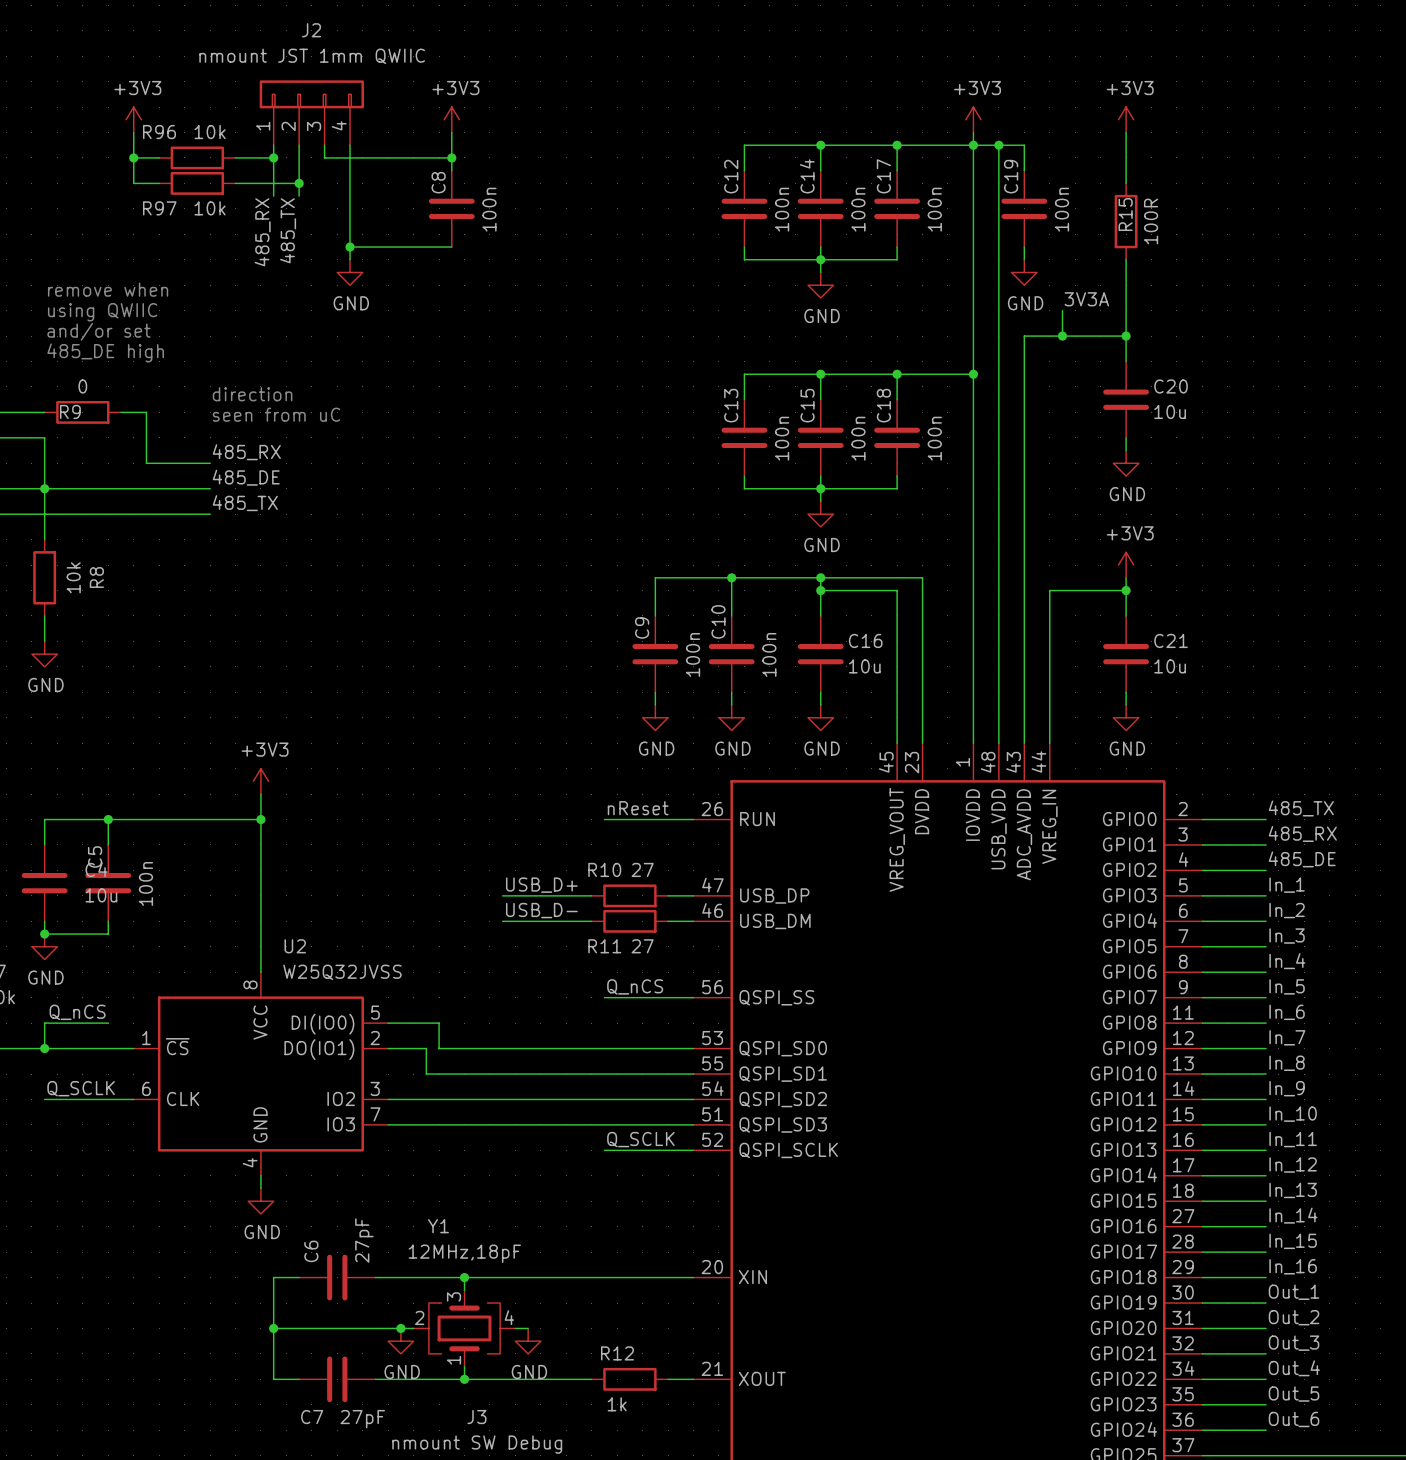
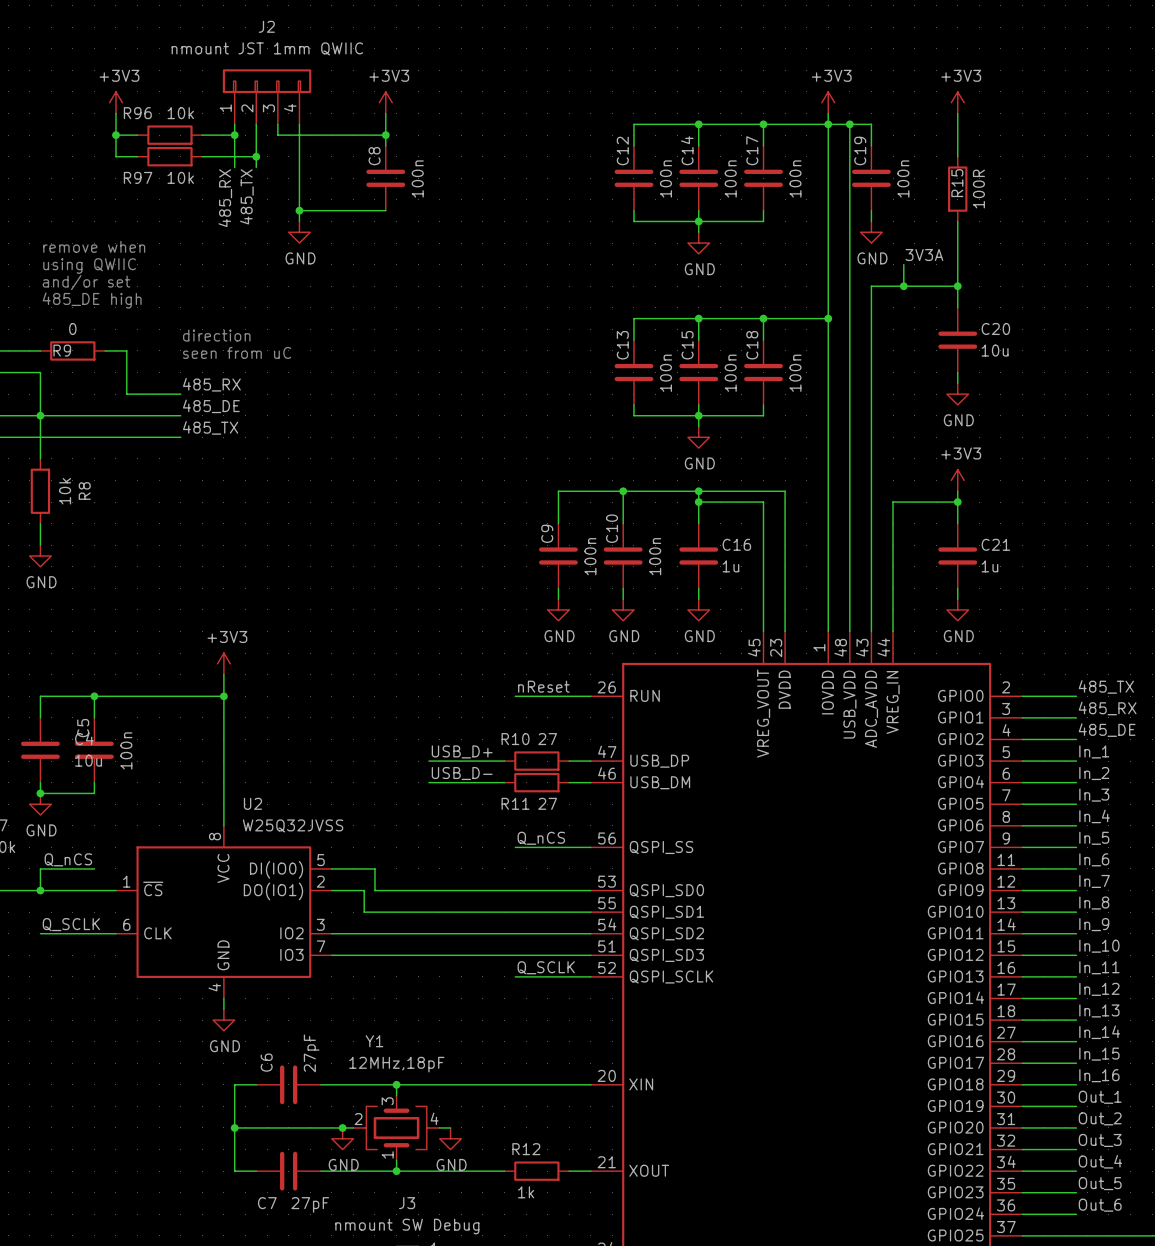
C16 value: 10u (864, 666) -> 1u (730, 566)
C21 value: 10u (1170, 666) -> 1u (989, 566)

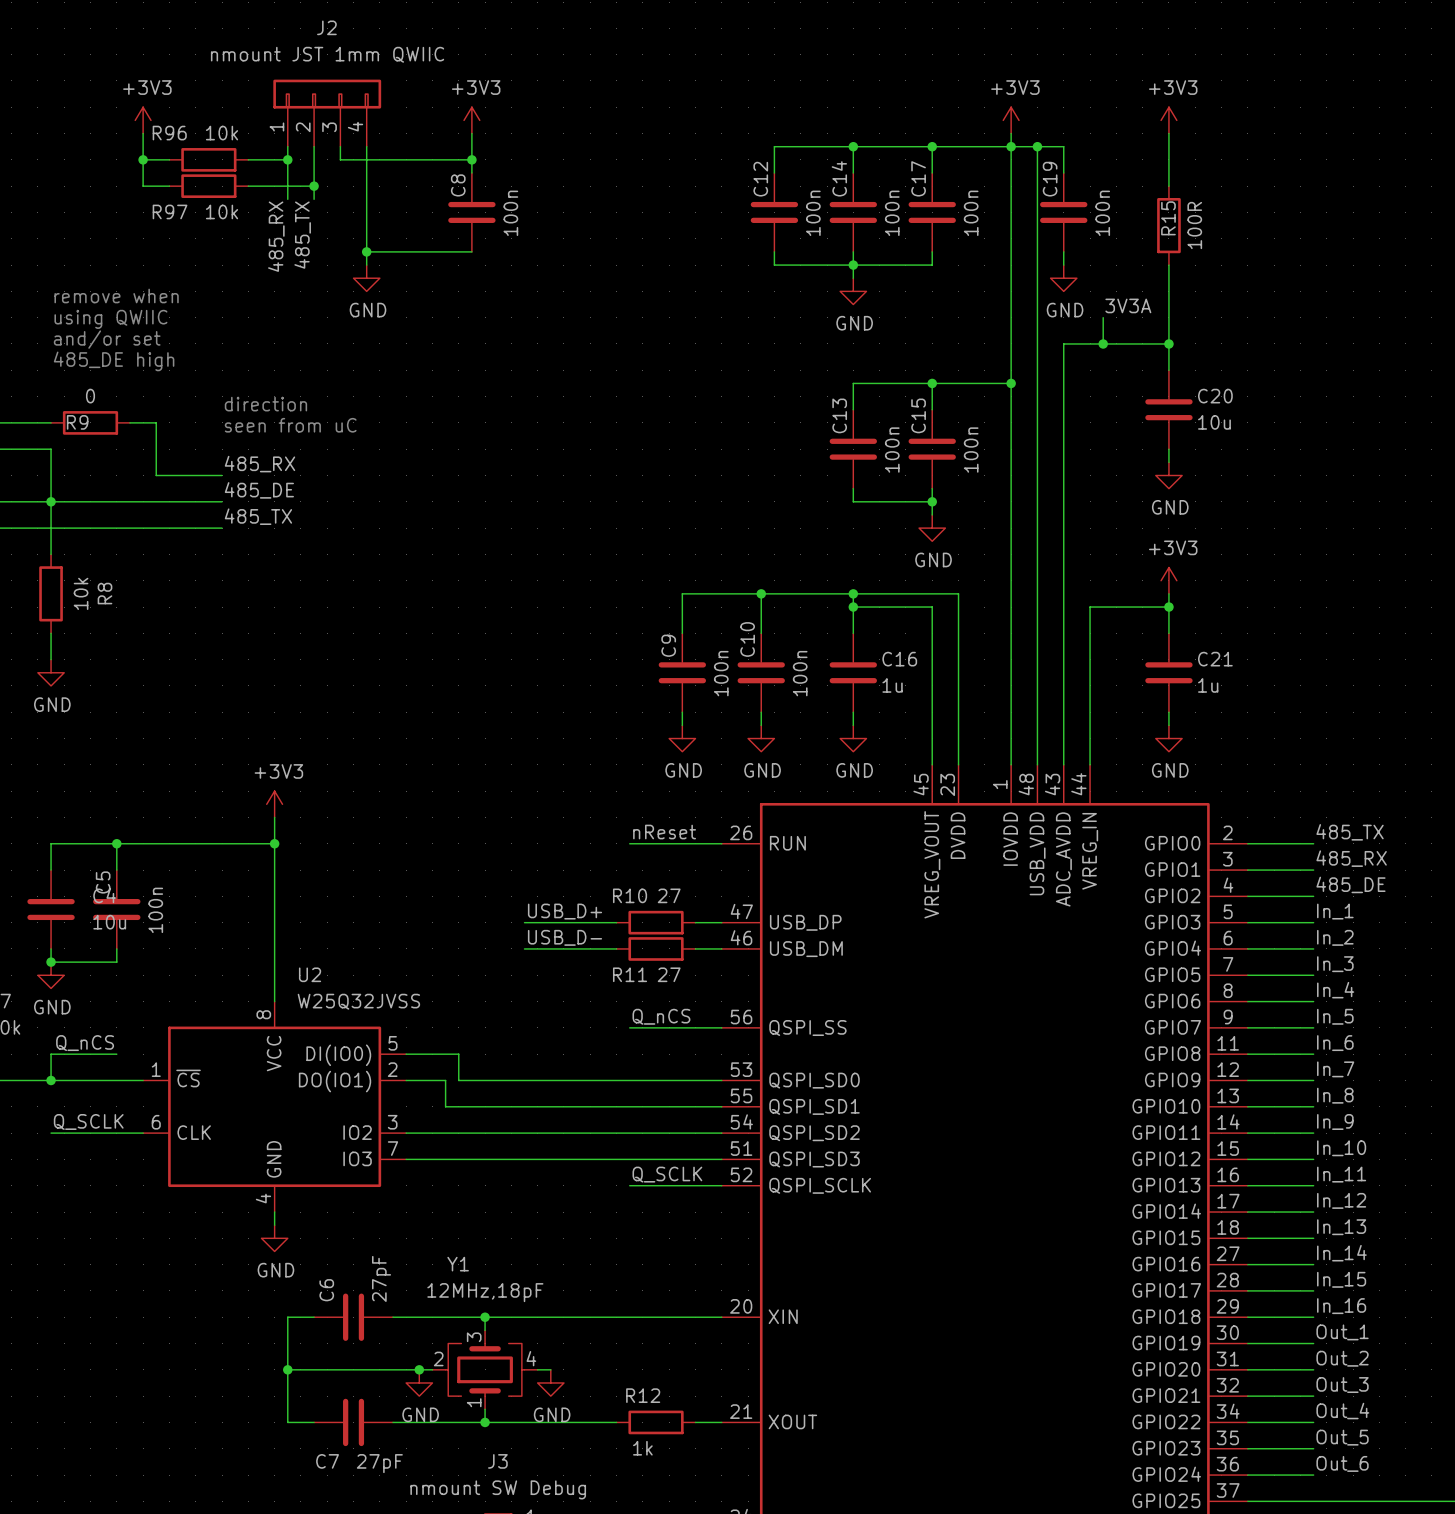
wire: (698, 318) (633, 318) (633, 340) -> none
junction: (698, 318) -> none
C15 name: C15 (687, 345) -> C13 (839, 415)
C18 name: C18 (752, 345) -> C15 (918, 415)
C13: 100n (633, 372) -> none
wire: (633, 404) (633, 415) (698, 415) (698, 426) -> none
junction: (698, 415) -> none
wire: none -> (932, 501) (932, 514)
junction: none -> (932, 501)
power symbol position: GND (698, 437) -> GND (932, 528)

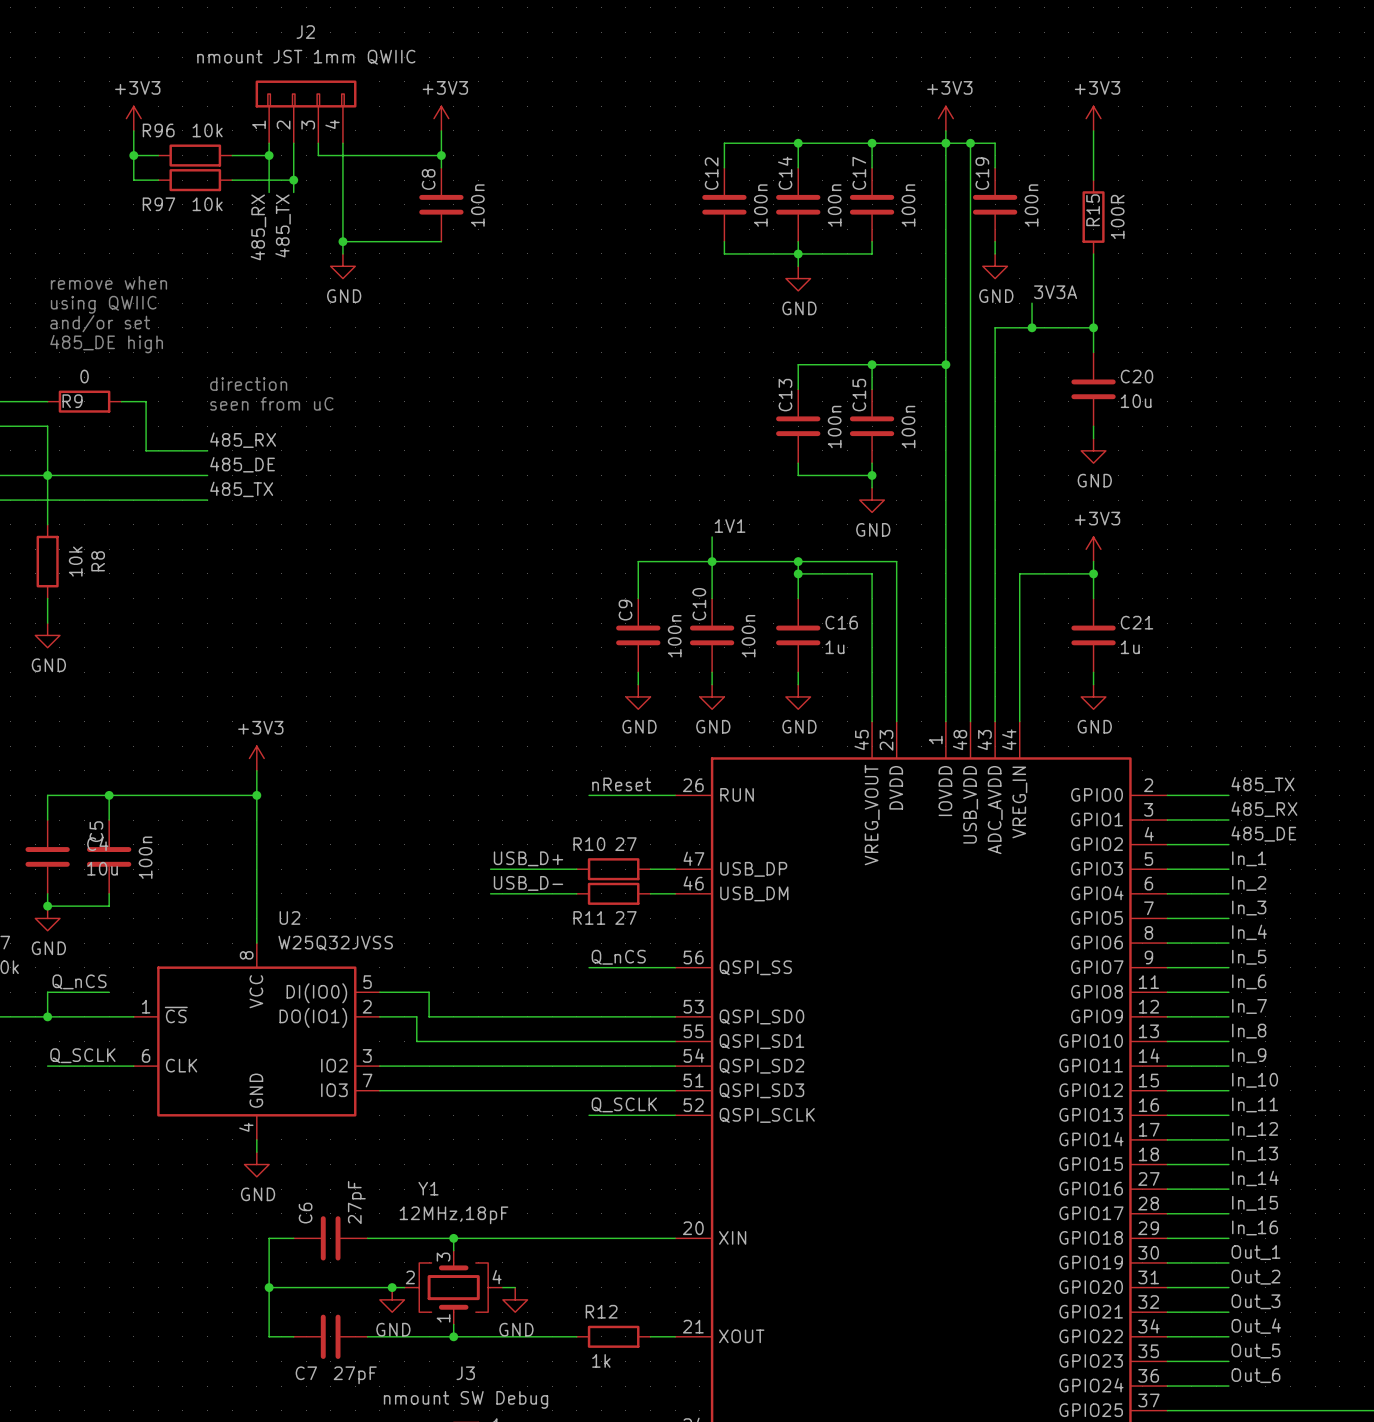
label: none -> 1V1 (730, 526)
wire: none -> (712, 536) (712, 561)

